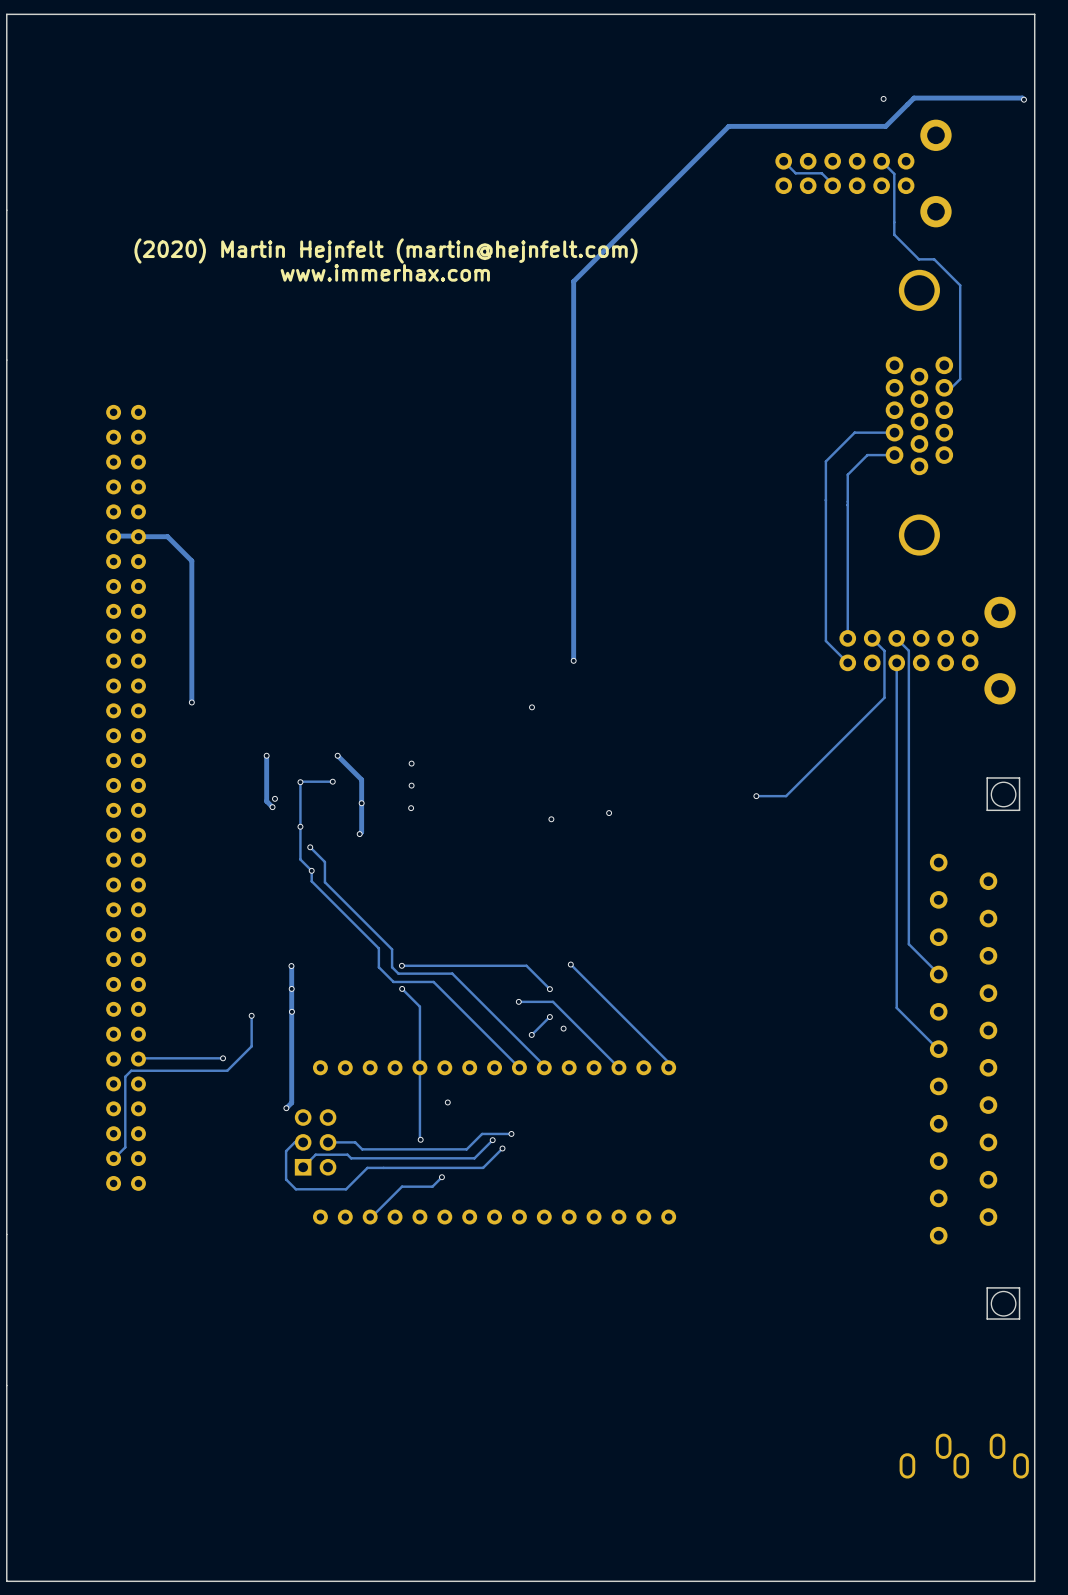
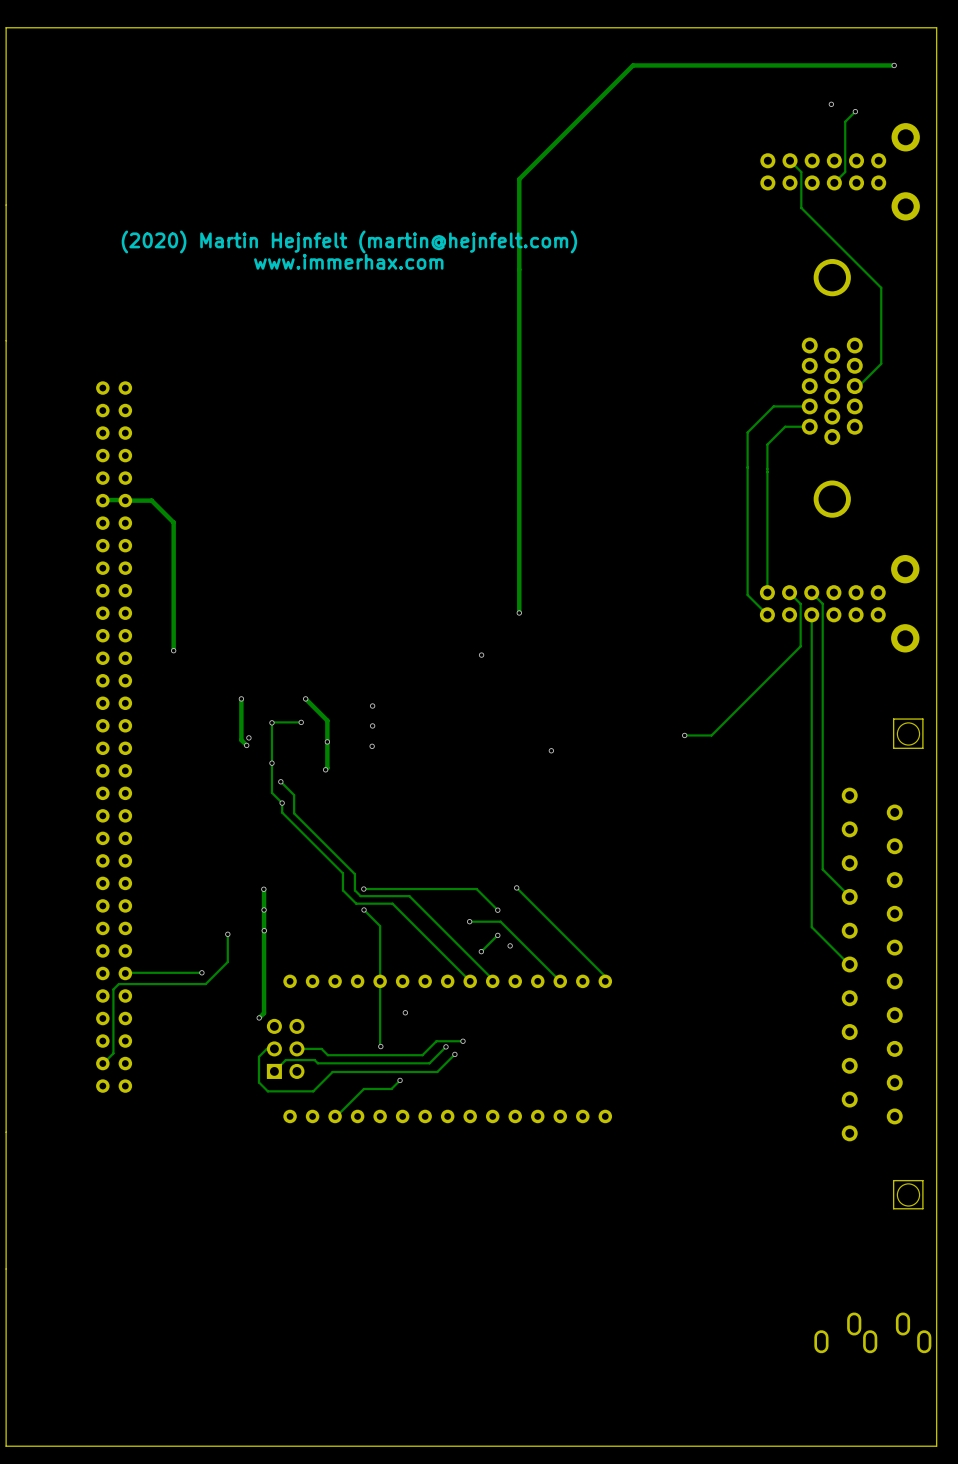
via: none -> (894, 65)
via: (883, 98) -> none
via: none -> (831, 104)
track: (1023, 99) (1022, 98) (914, 98) (885, 126) (728, 126) (573, 281) -> (894, 65) (633, 65) (519, 179) (519, 269)
via: (1023, 99) -> none
track: none -> (855, 111) (845, 121) (845, 172) (834, 182)
via: none -> (855, 111)
track: (783, 161) (795, 173) (821, 173) (832, 185) -> none
track: none -> (790, 160) (801, 172) (801, 207) (881, 287) (881, 363) (858, 386) (854, 386)
track: (881, 161) (894, 173) (894, 234) (918, 259) (934, 259) (960, 285) (960, 379) (951, 387) (944, 387) -> none
part position: (863, 173) -> (840, 171)
via: (551, 819) -> none

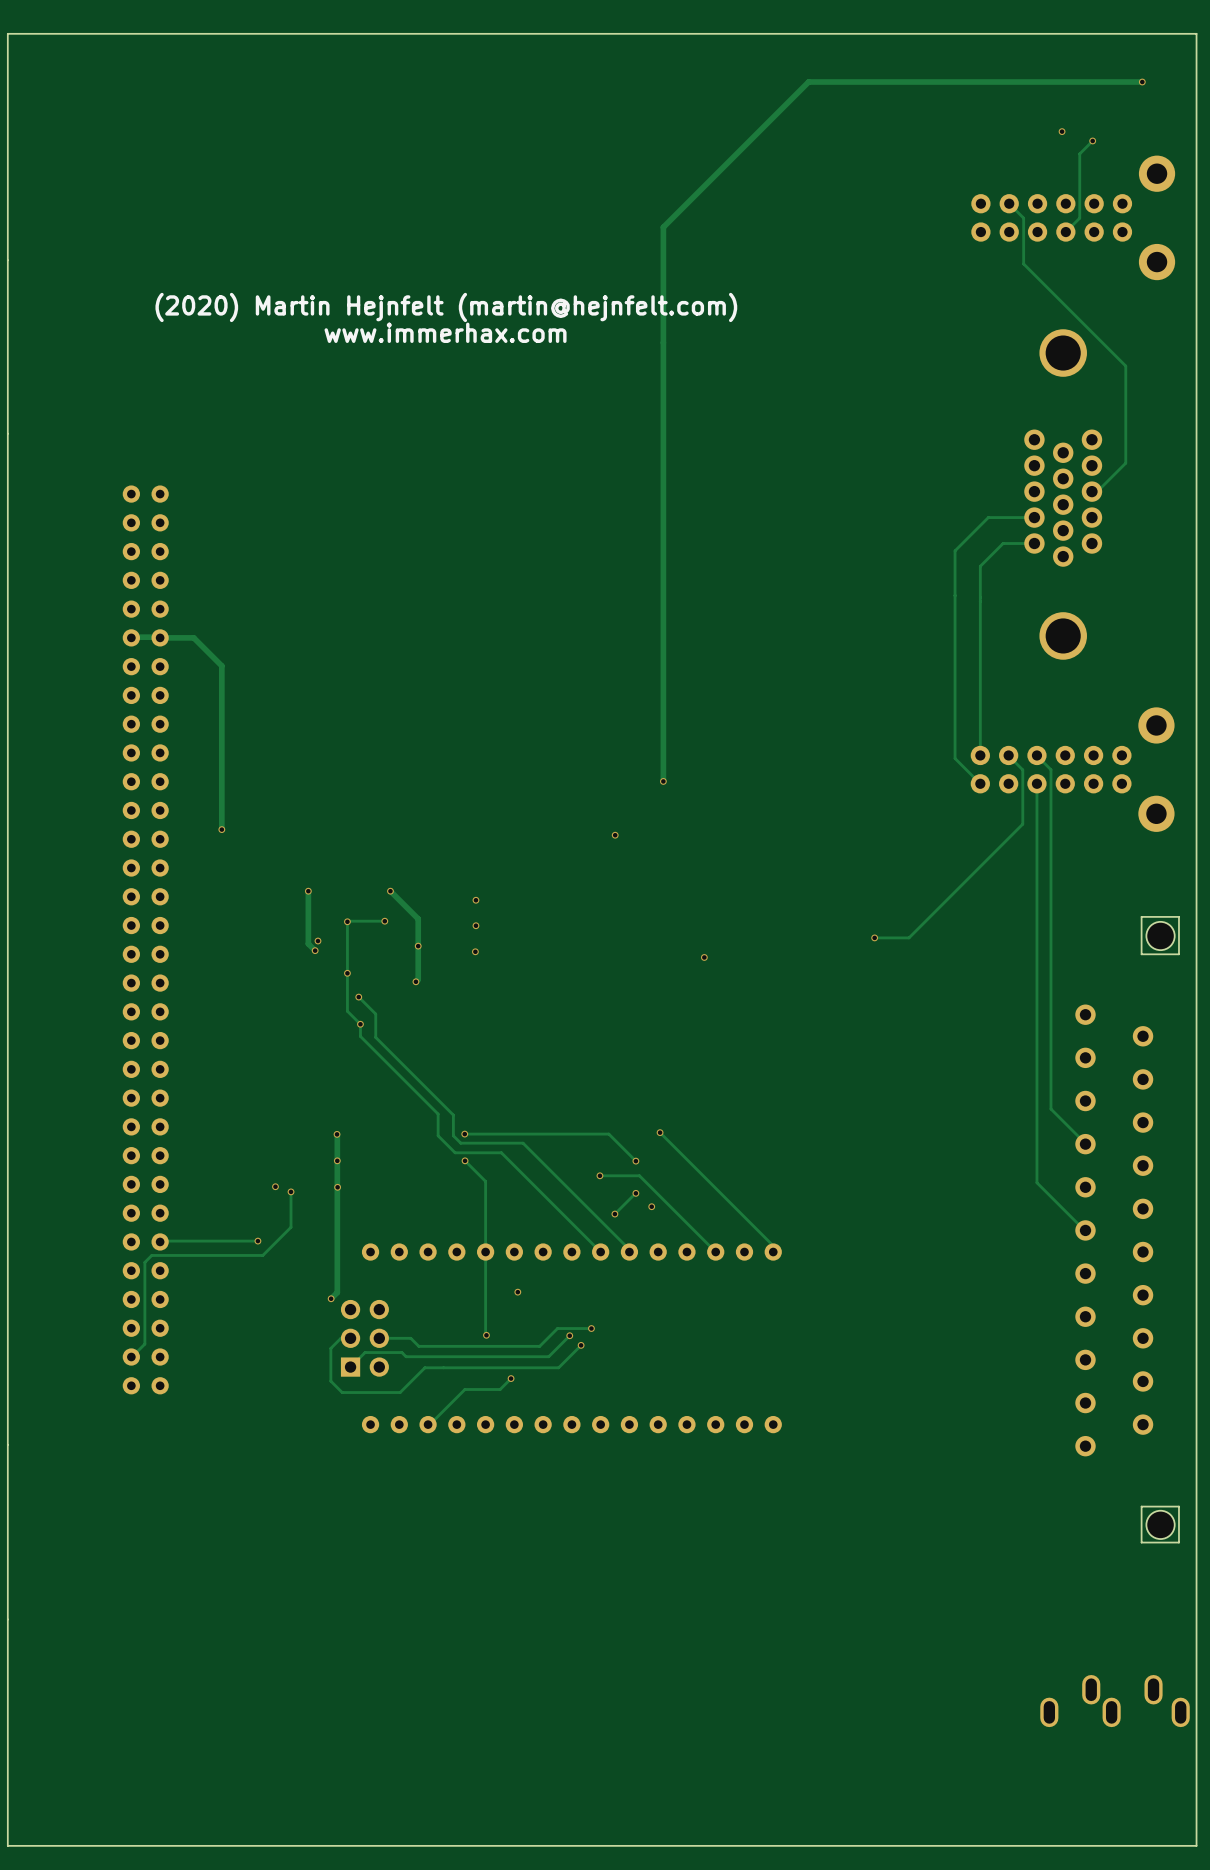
via: none -> (275, 1186)

